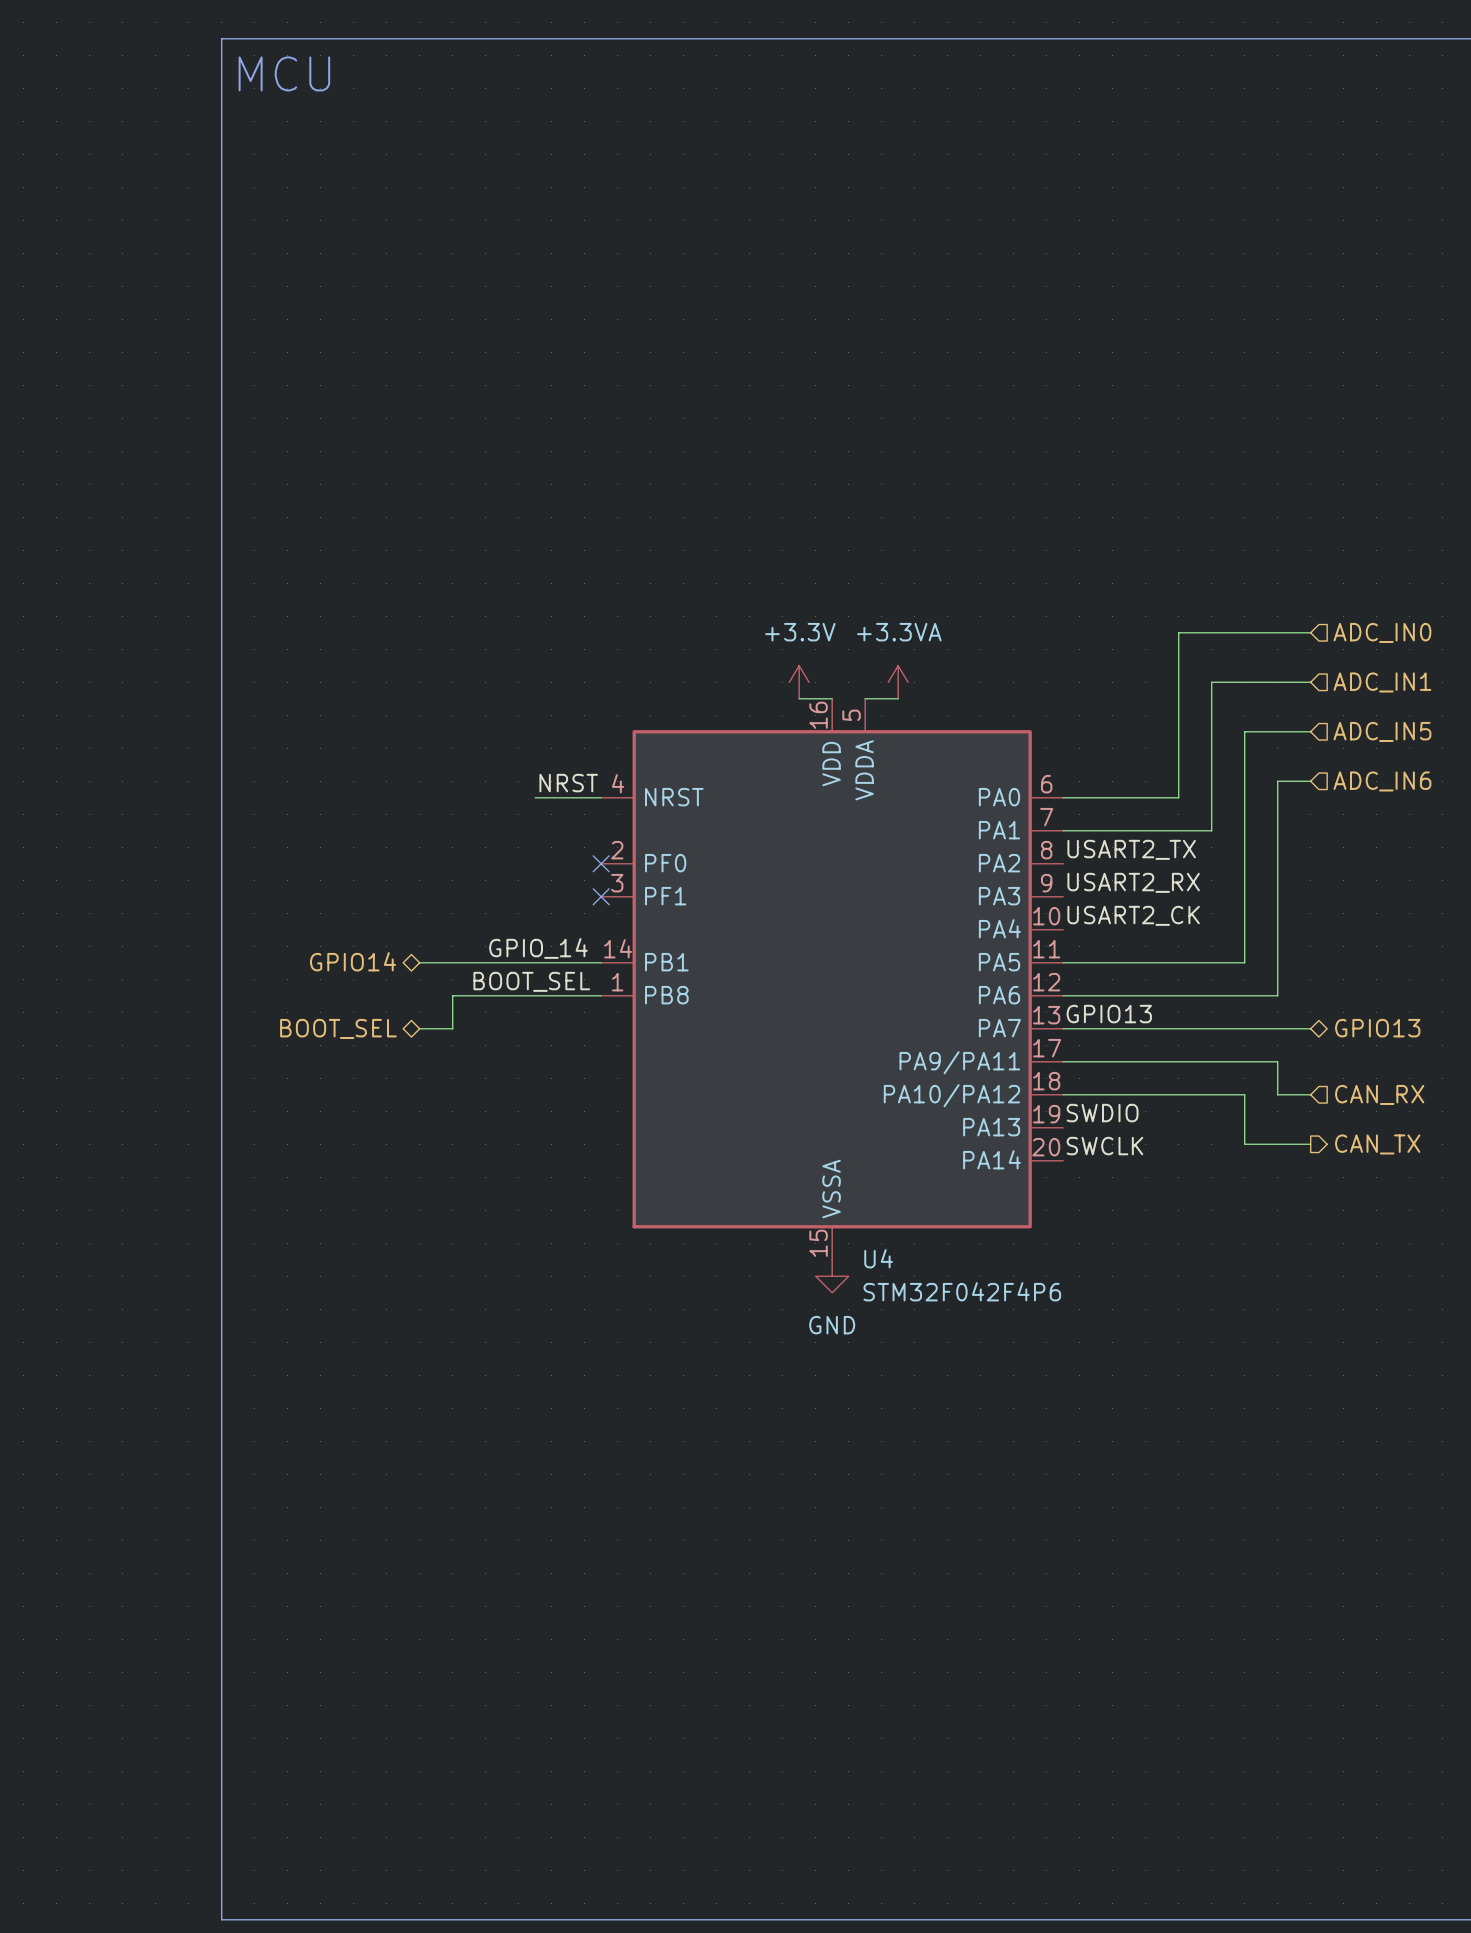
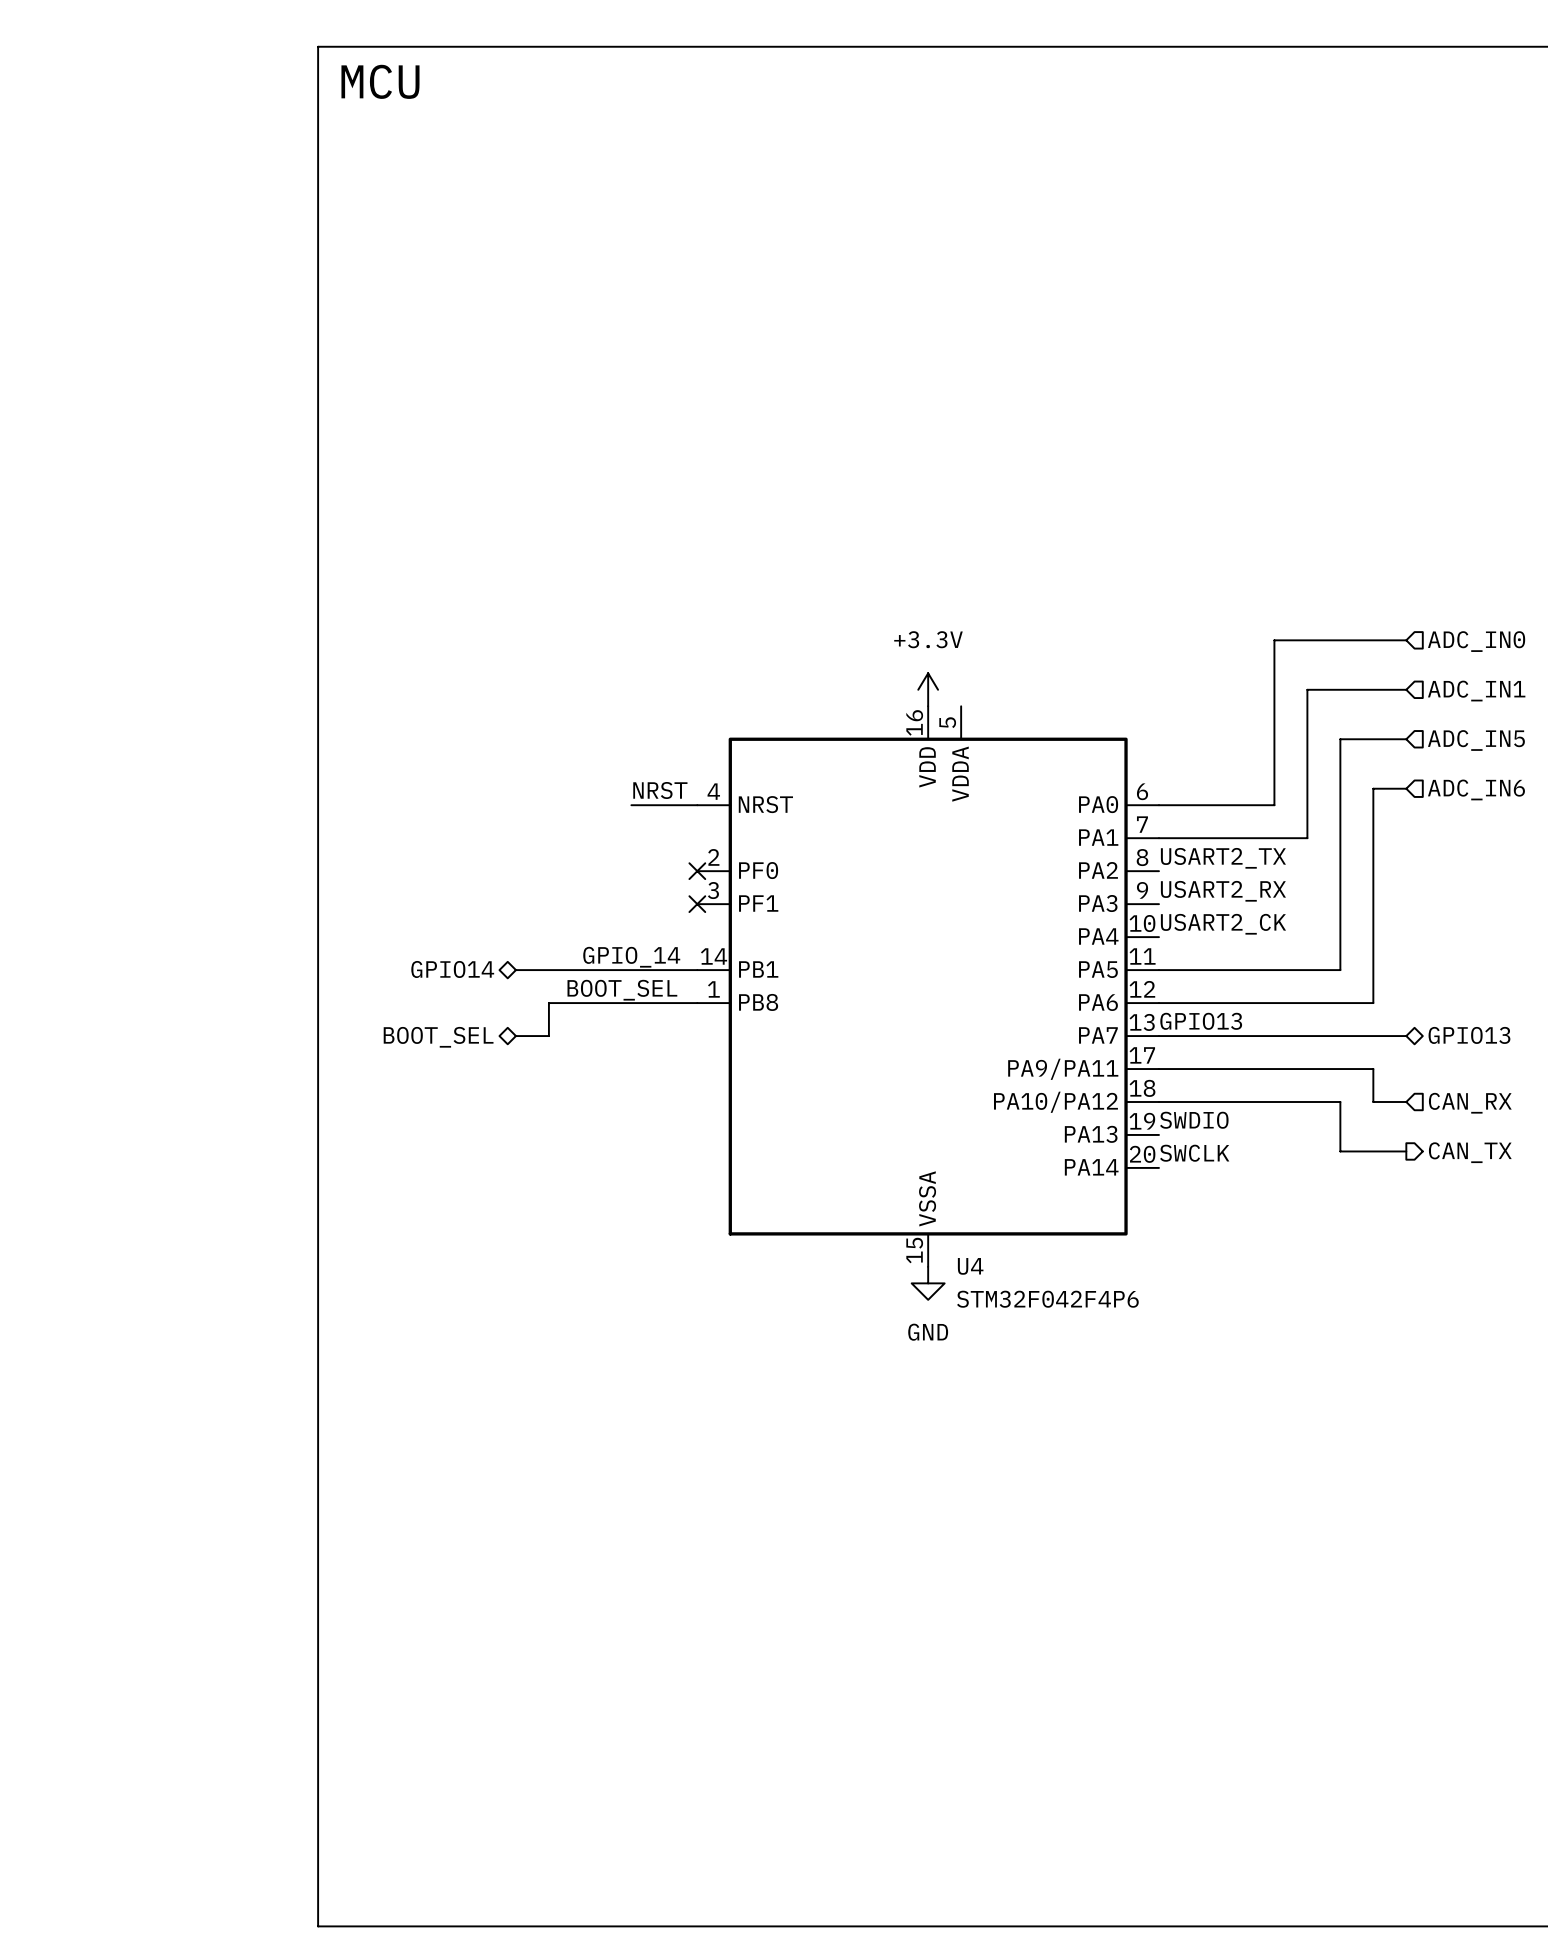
power symbol position: +3.3V (799, 682) -> +3.3V (928, 689)
power symbol: +3.3VA (898, 682) -> none
wire: (799, 698) (832, 698) -> none
wire: (865, 698) (898, 698) -> none

